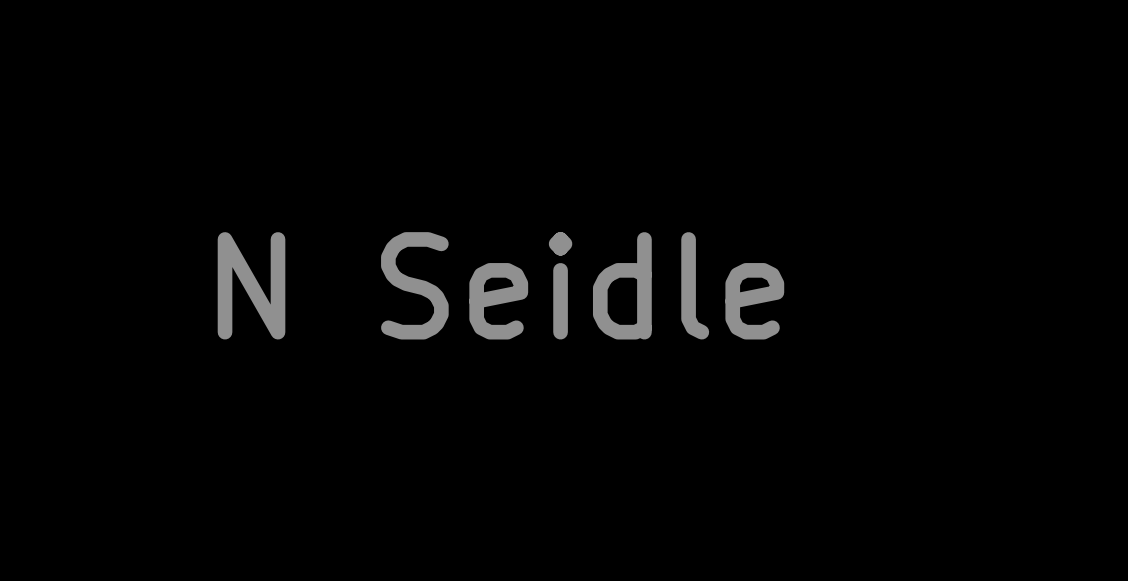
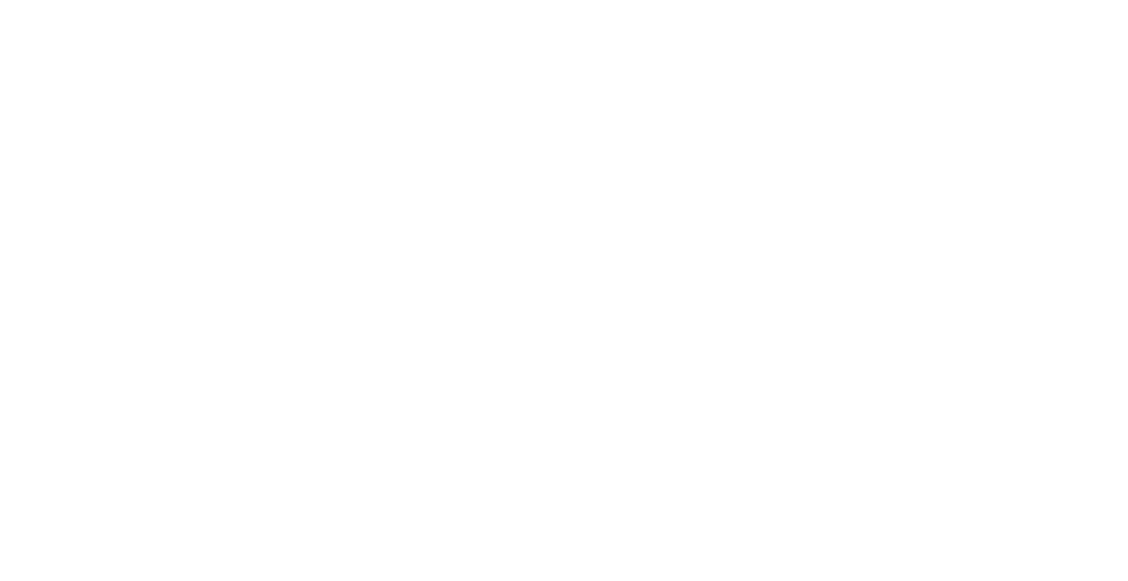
text: N Seidle (500, 285) -> none

